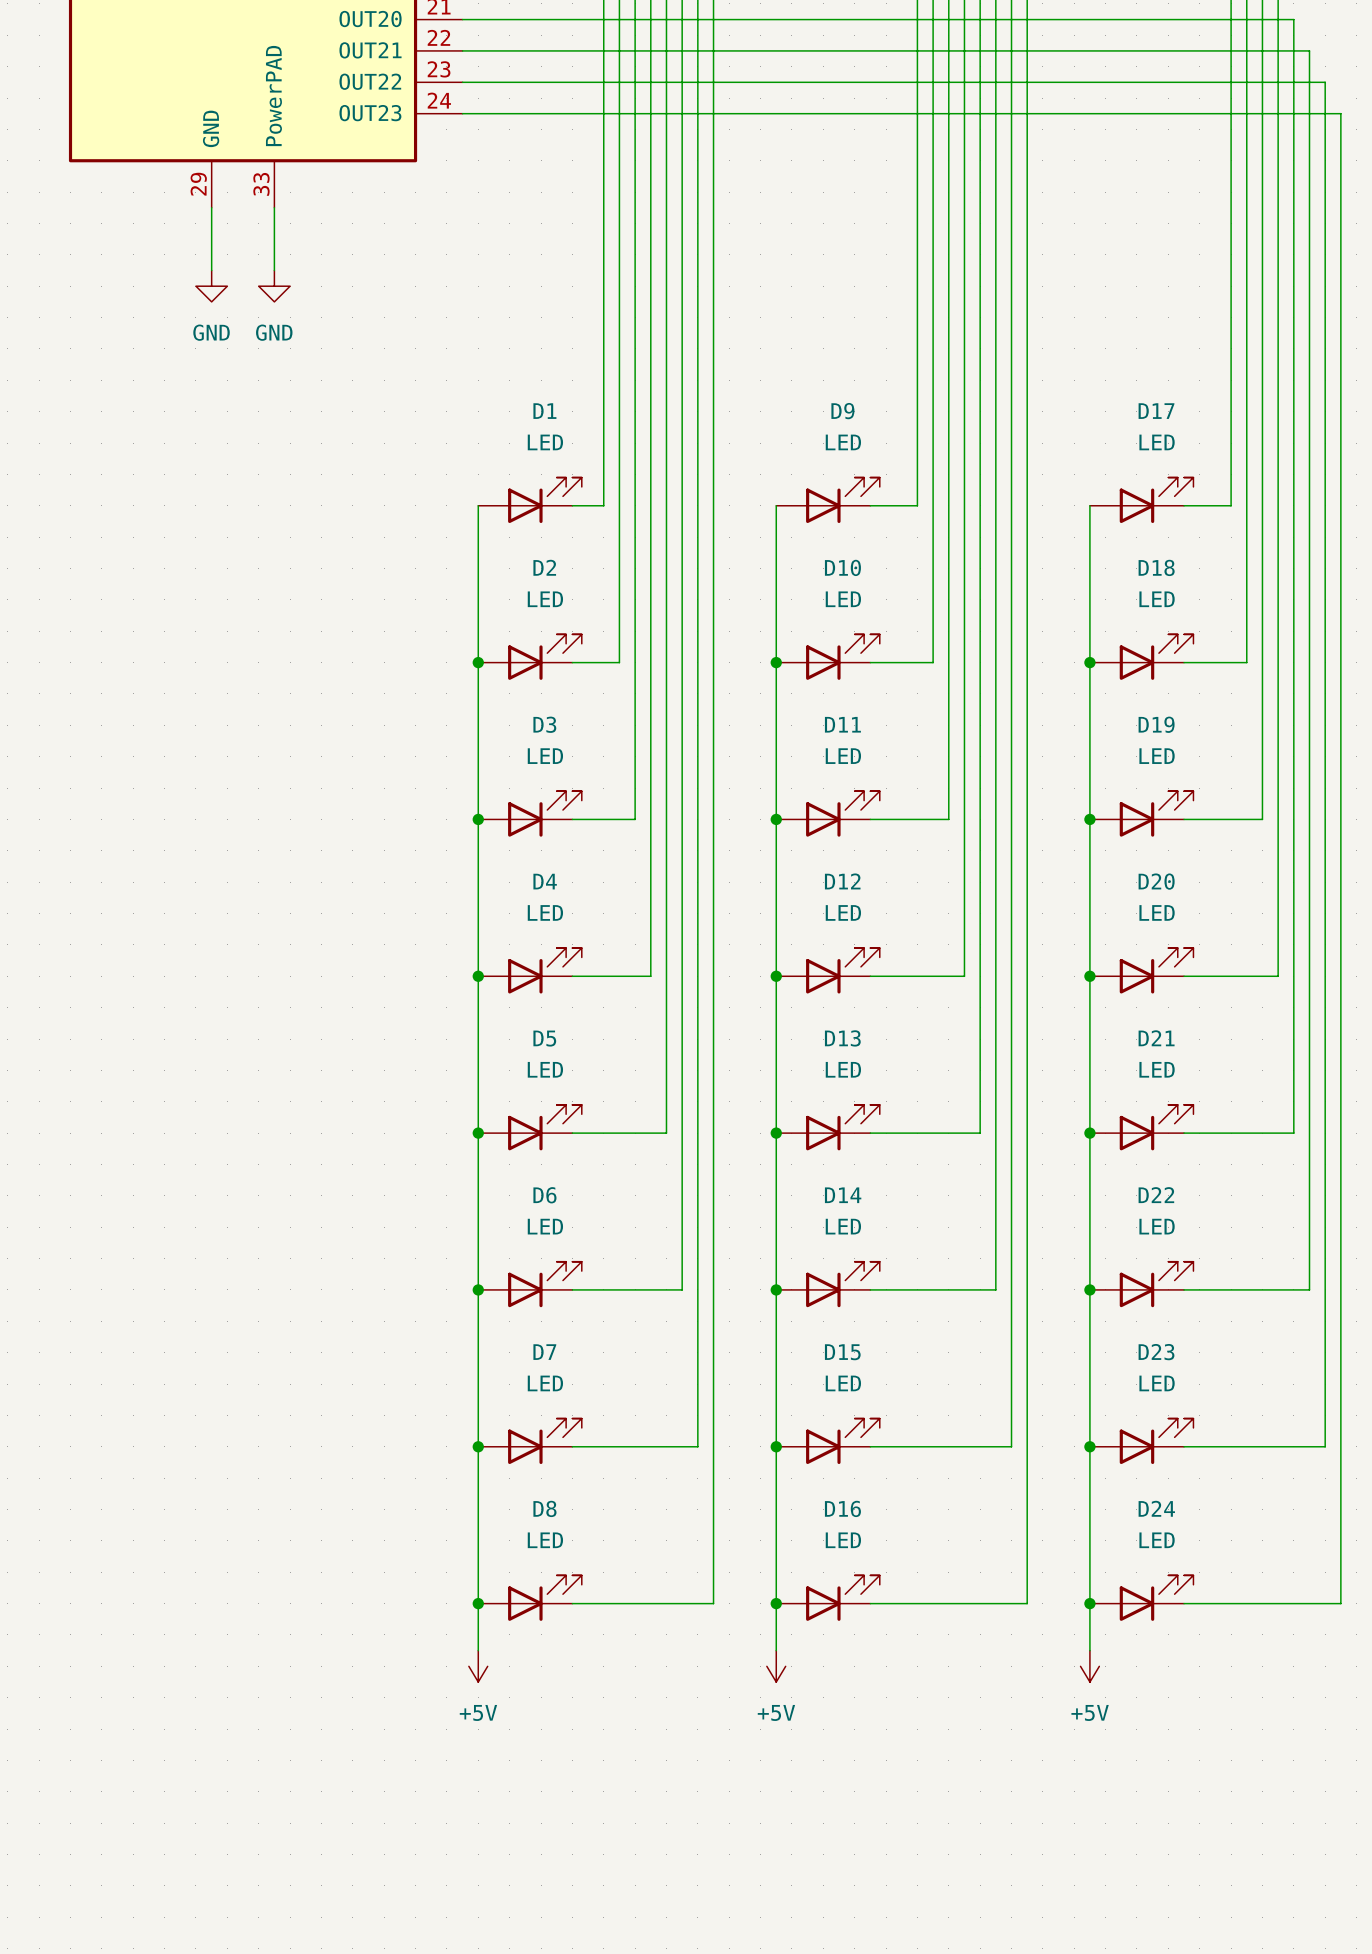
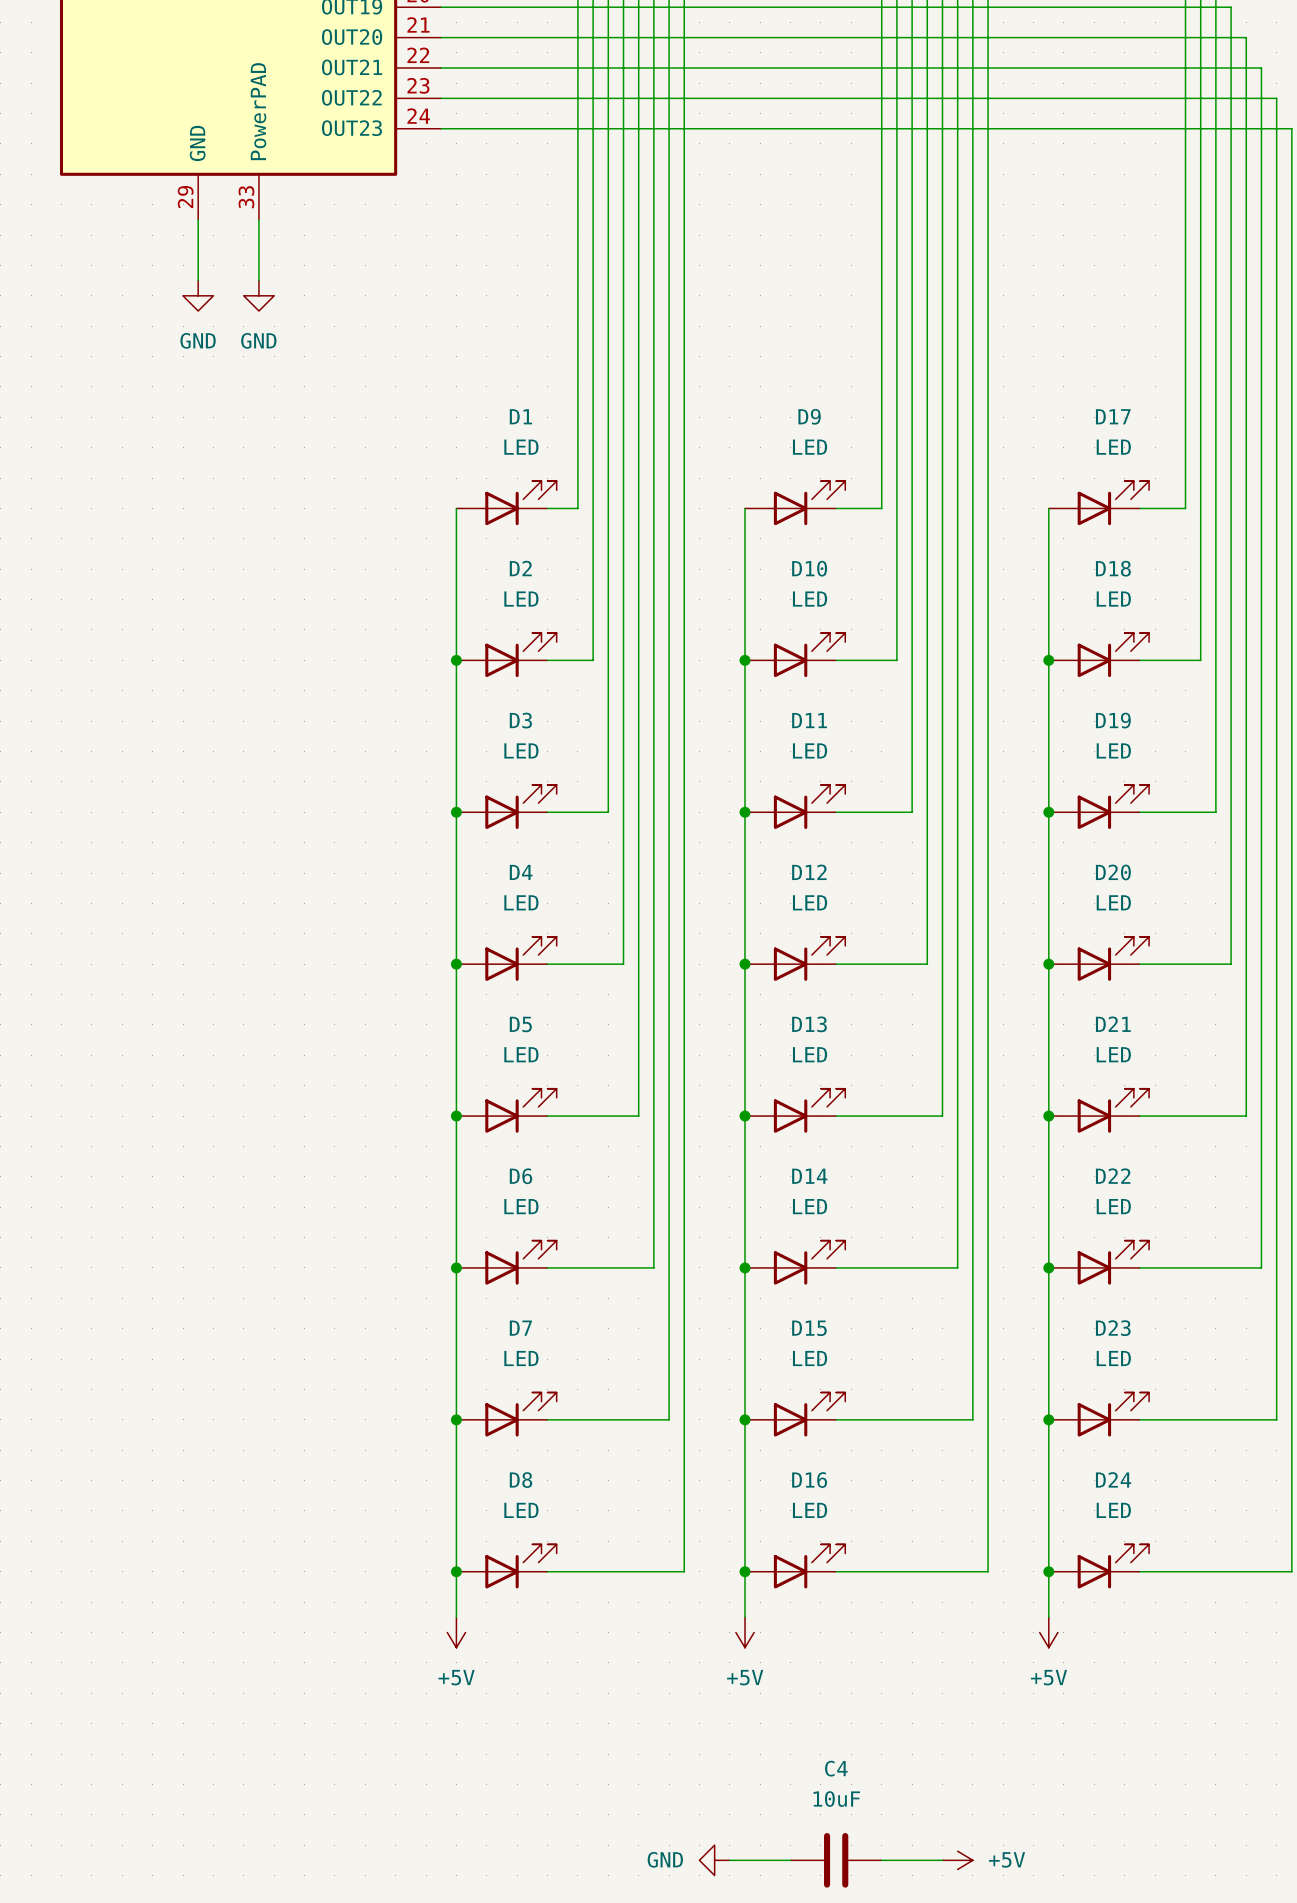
power symbol: none -> GND (714, 1860)
wire: none -> (729, 1860) (790, 1860)
C4: none -> 10uF (836, 1860)
wire: none -> (881, 1860) (942, 1860)
power symbol: none -> +5V (957, 1860)

